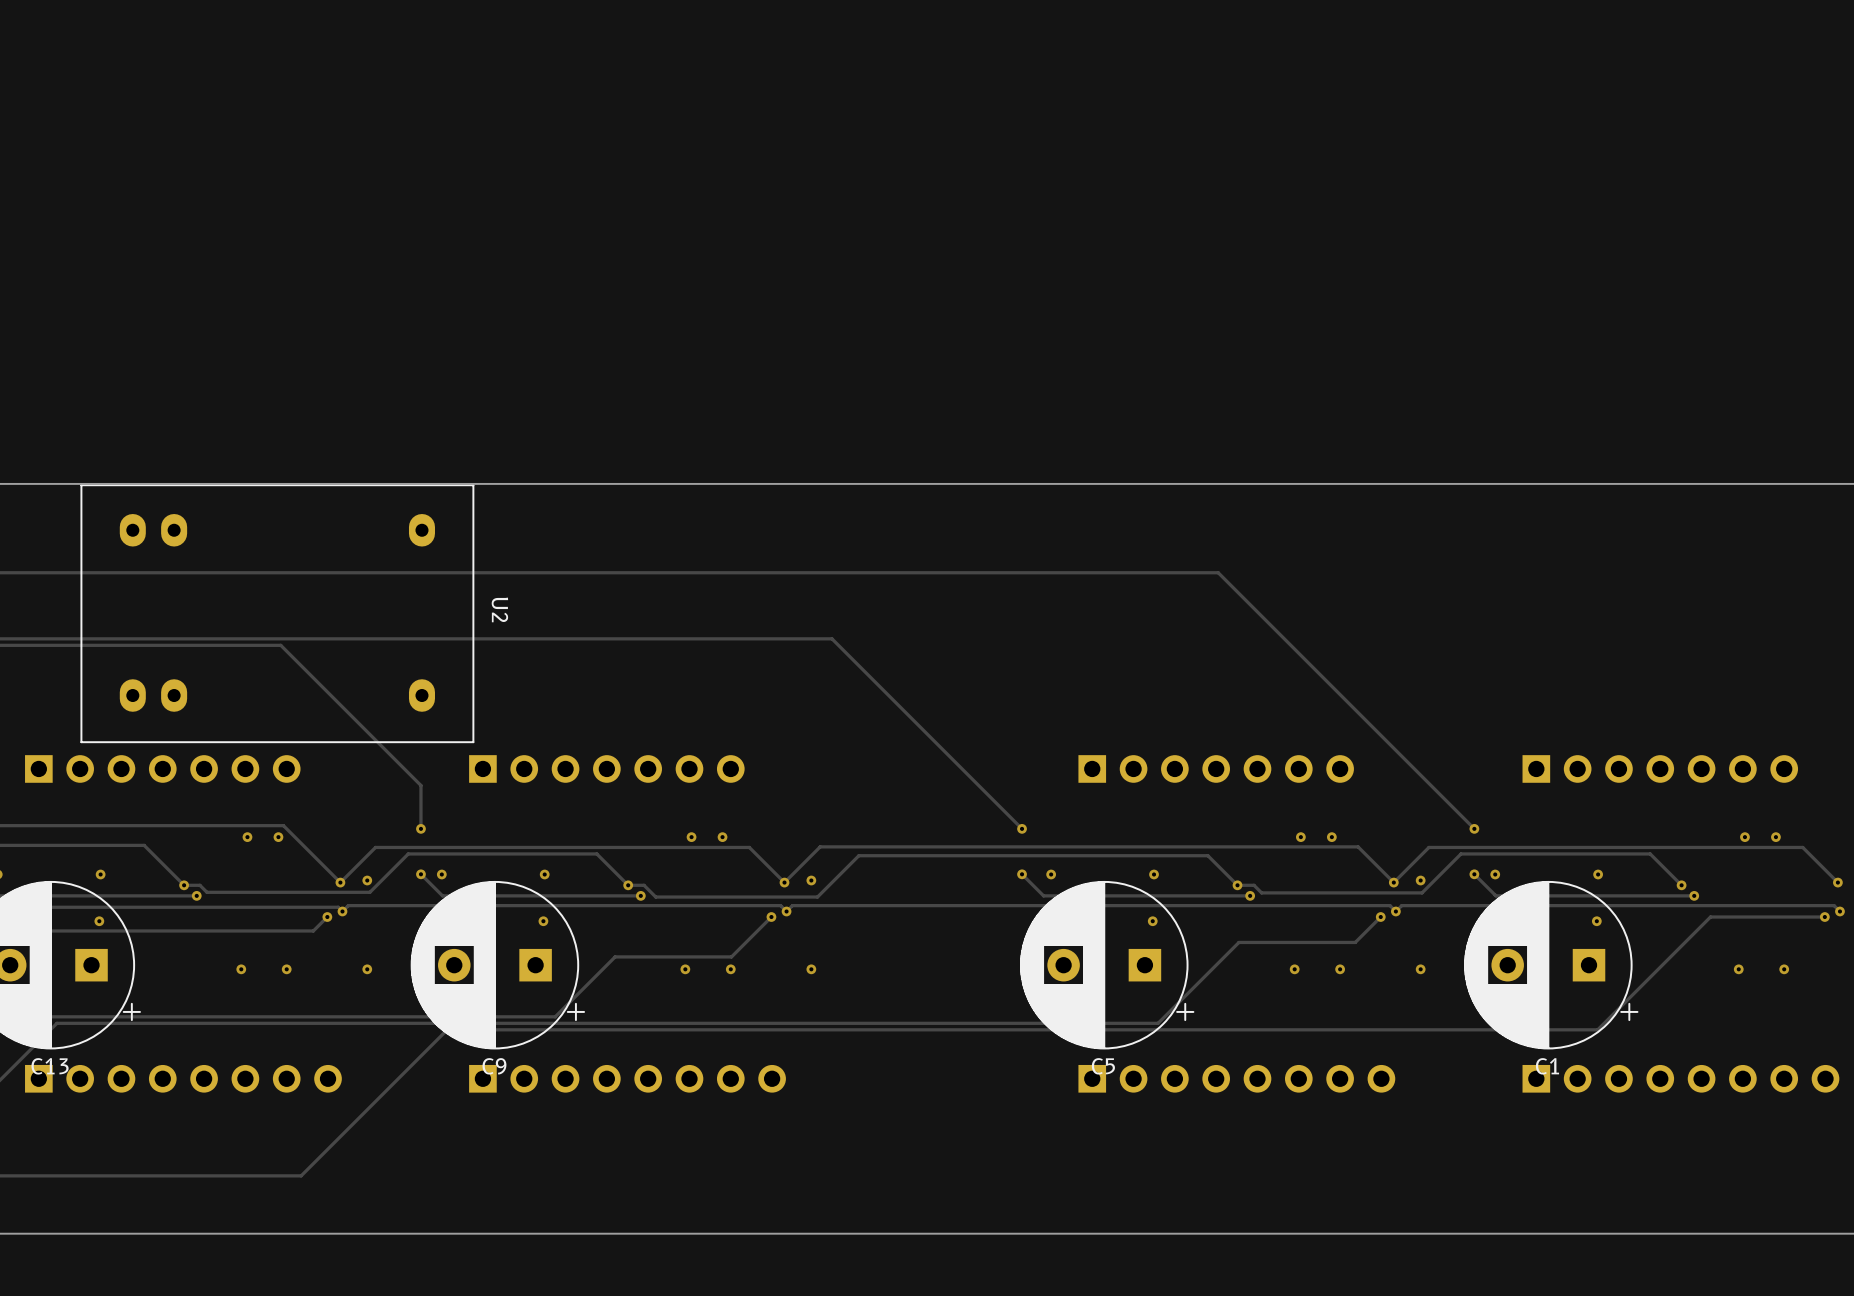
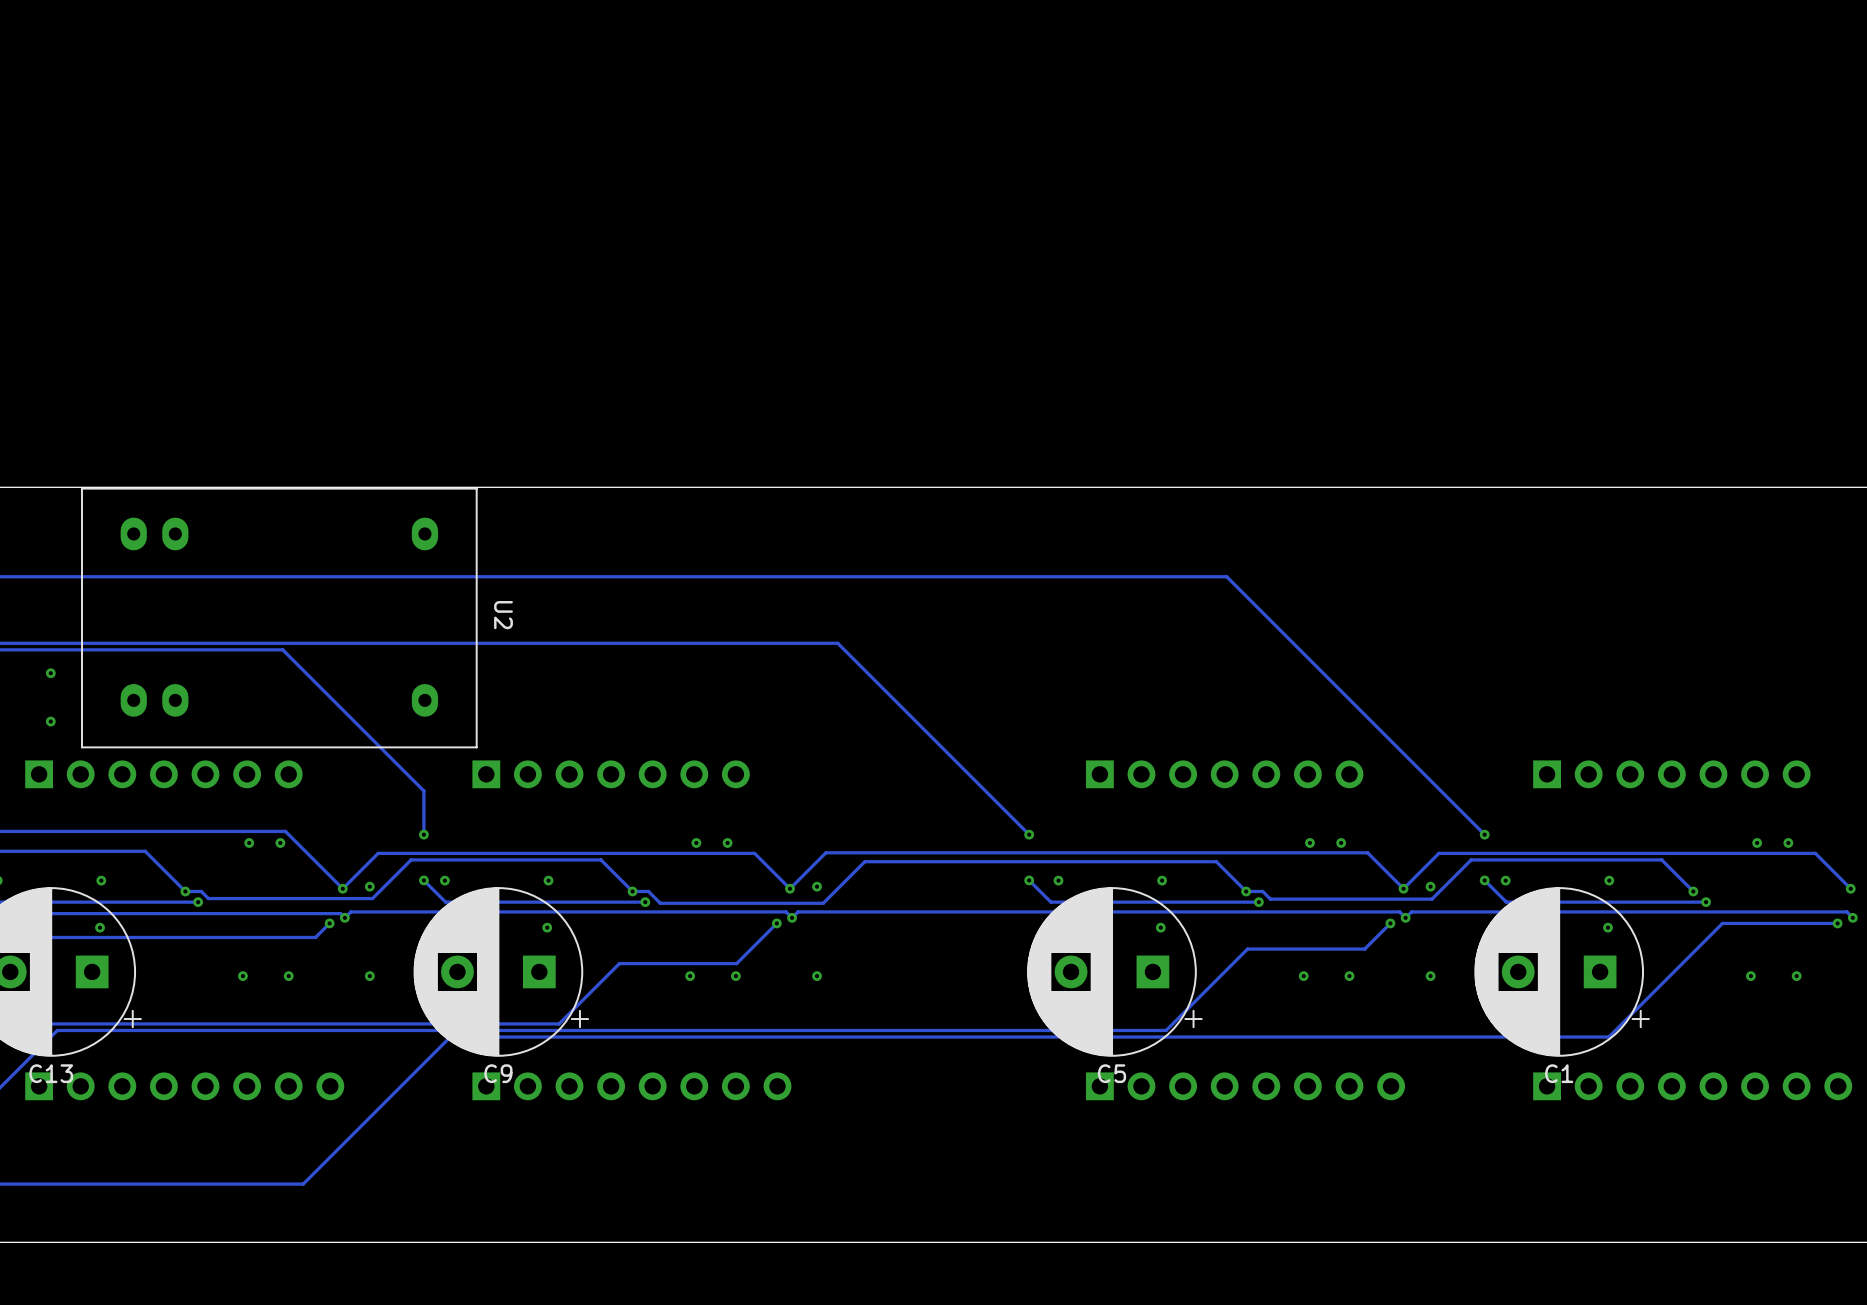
via: none -> (50, 673)
via: none -> (50, 721)

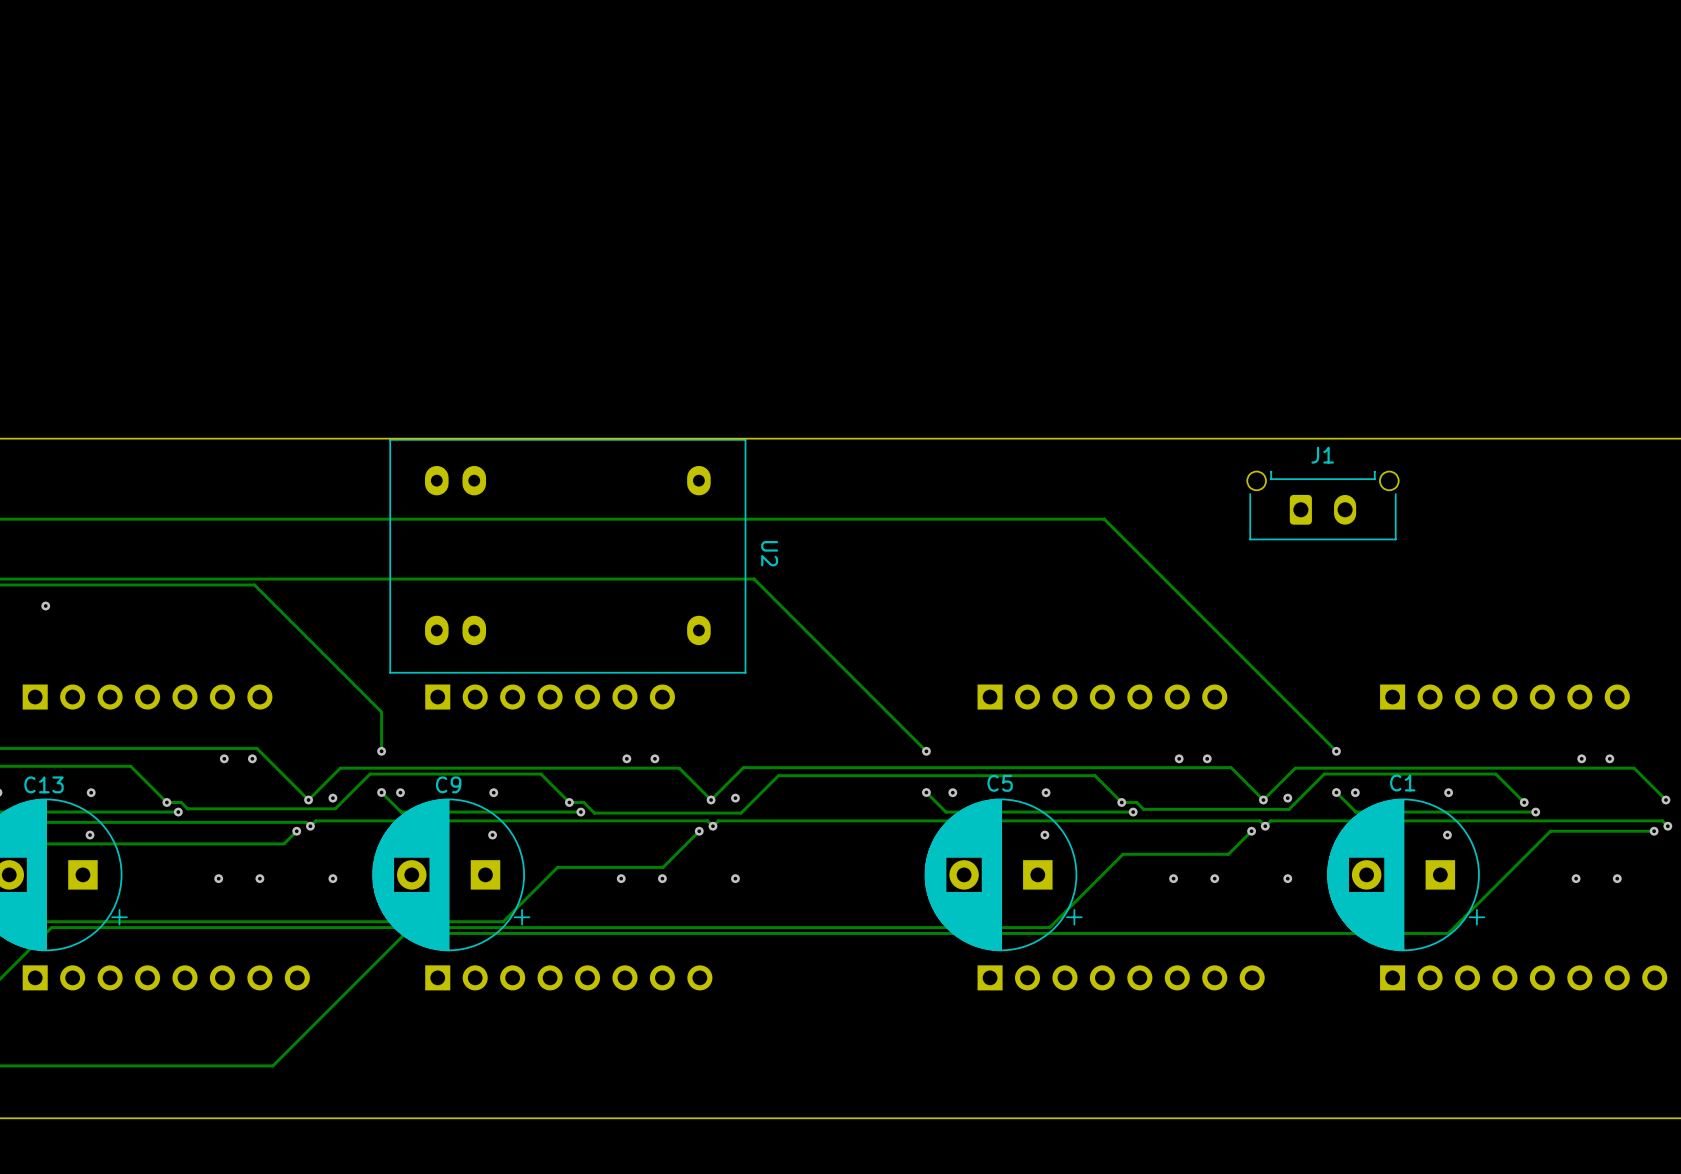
J1: none -> (1322, 505)
U2 position: (279, 617) -> (567, 556)
via: (50, 721) -> none
C13 name position: C13 (51, 1073) -> C13 (43, 784)
C9 name position: C9 (498, 1073) -> C9 (448, 784)
C5 name position: C5 (1111, 1073) -> C5 (1000, 783)
C1 name position: C1 (1559, 1073) -> C1 (1402, 783)

